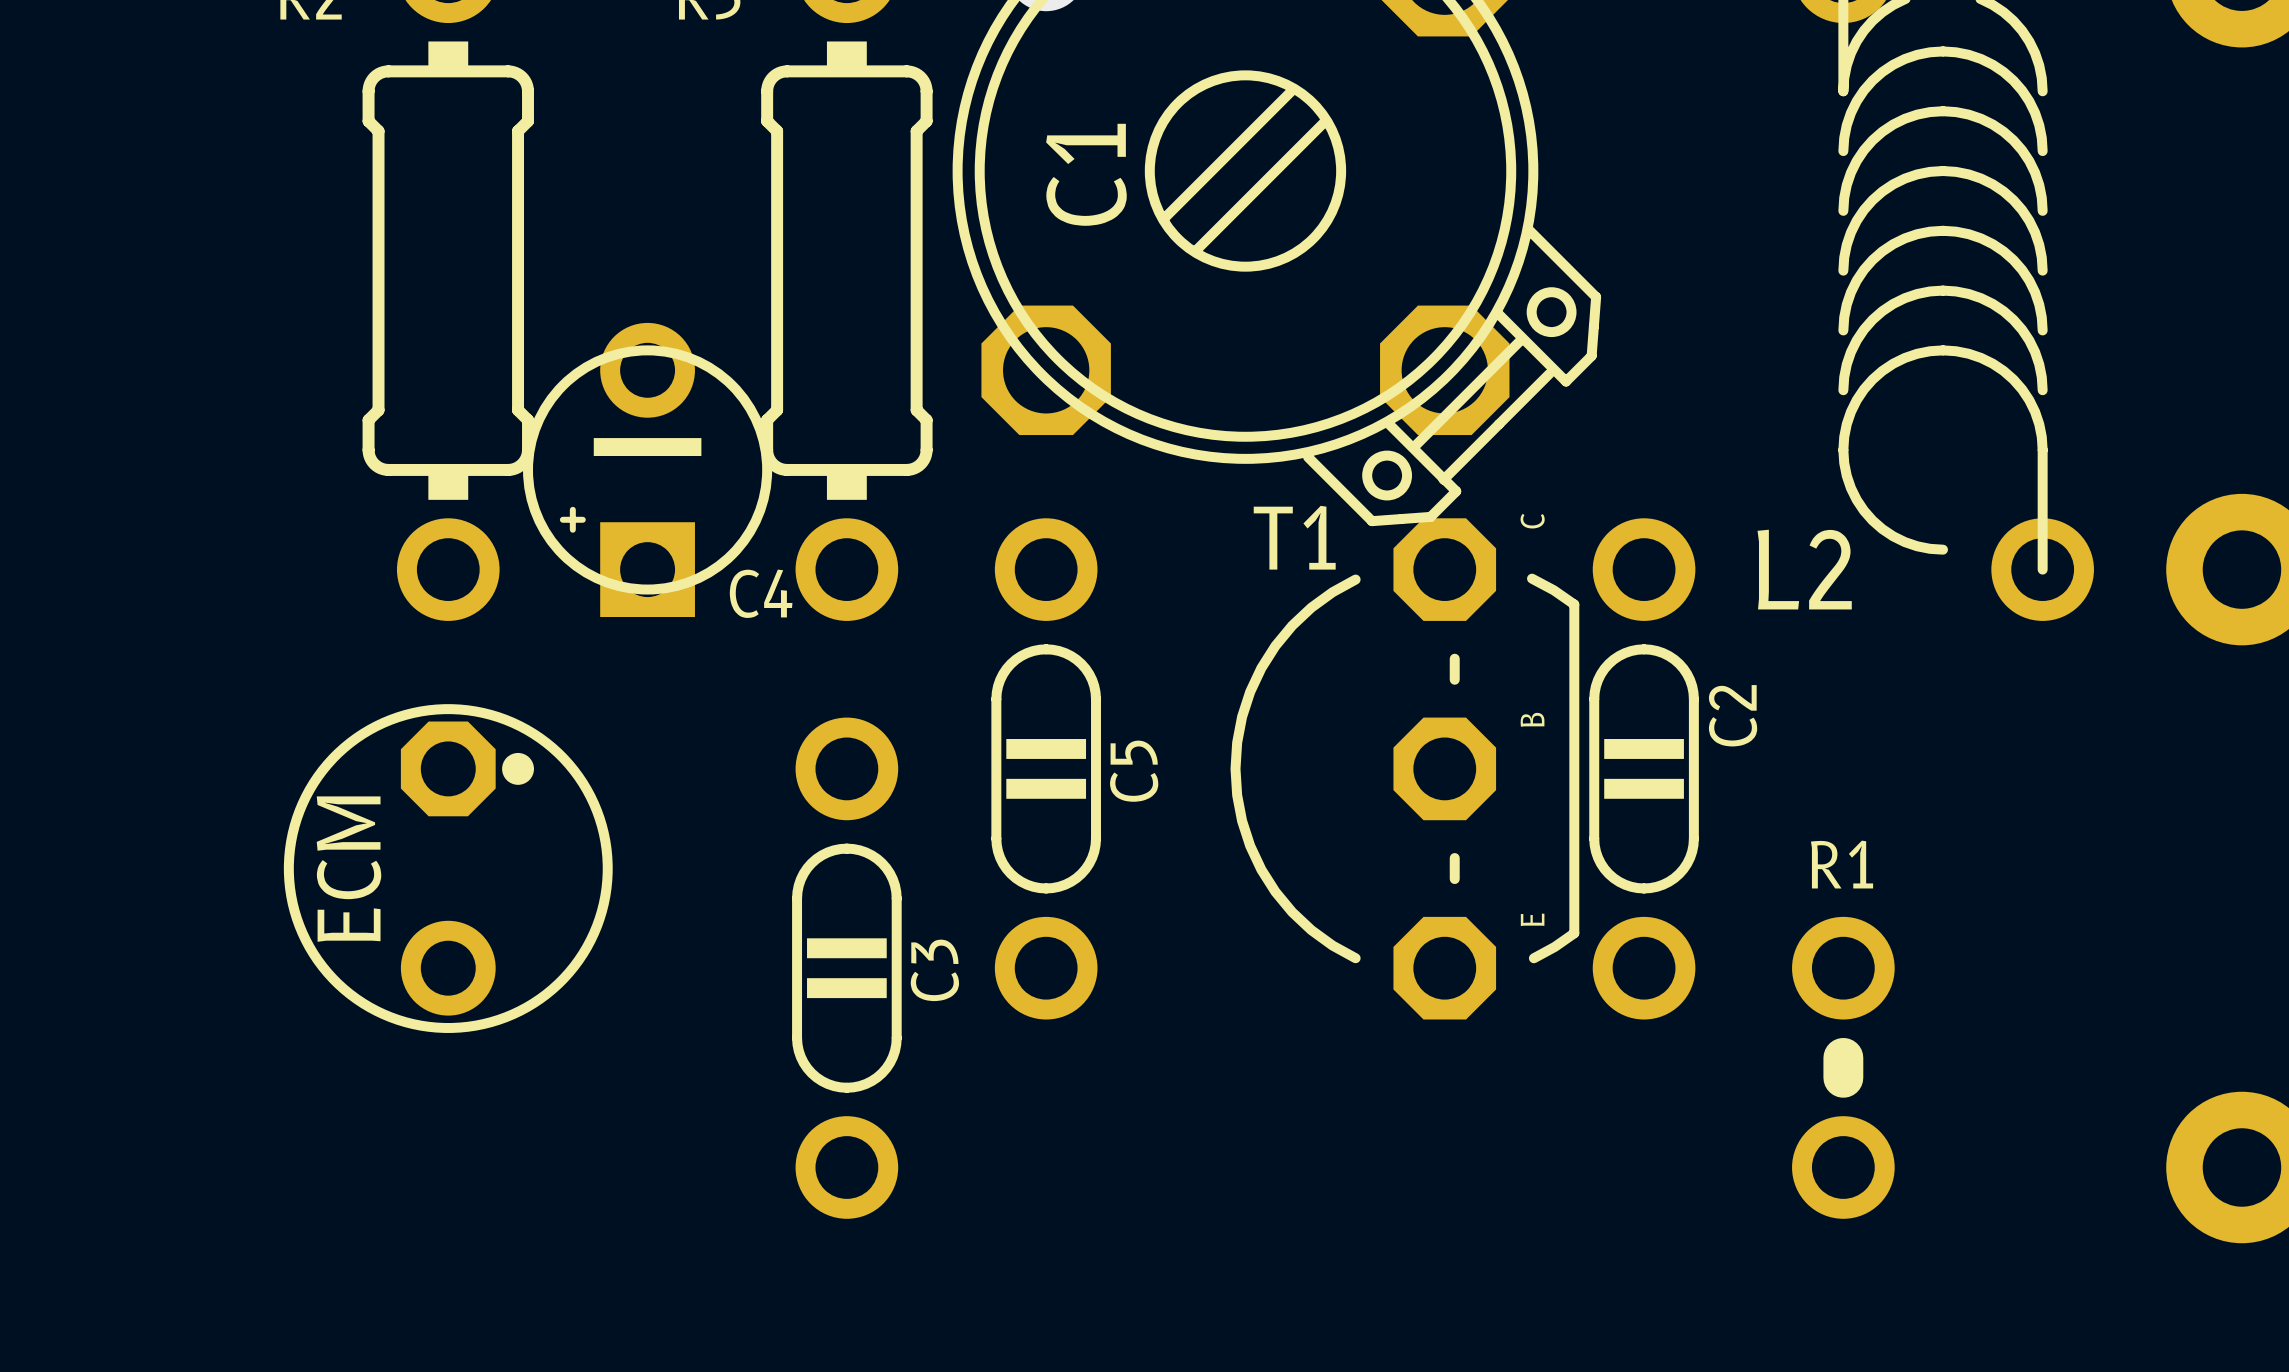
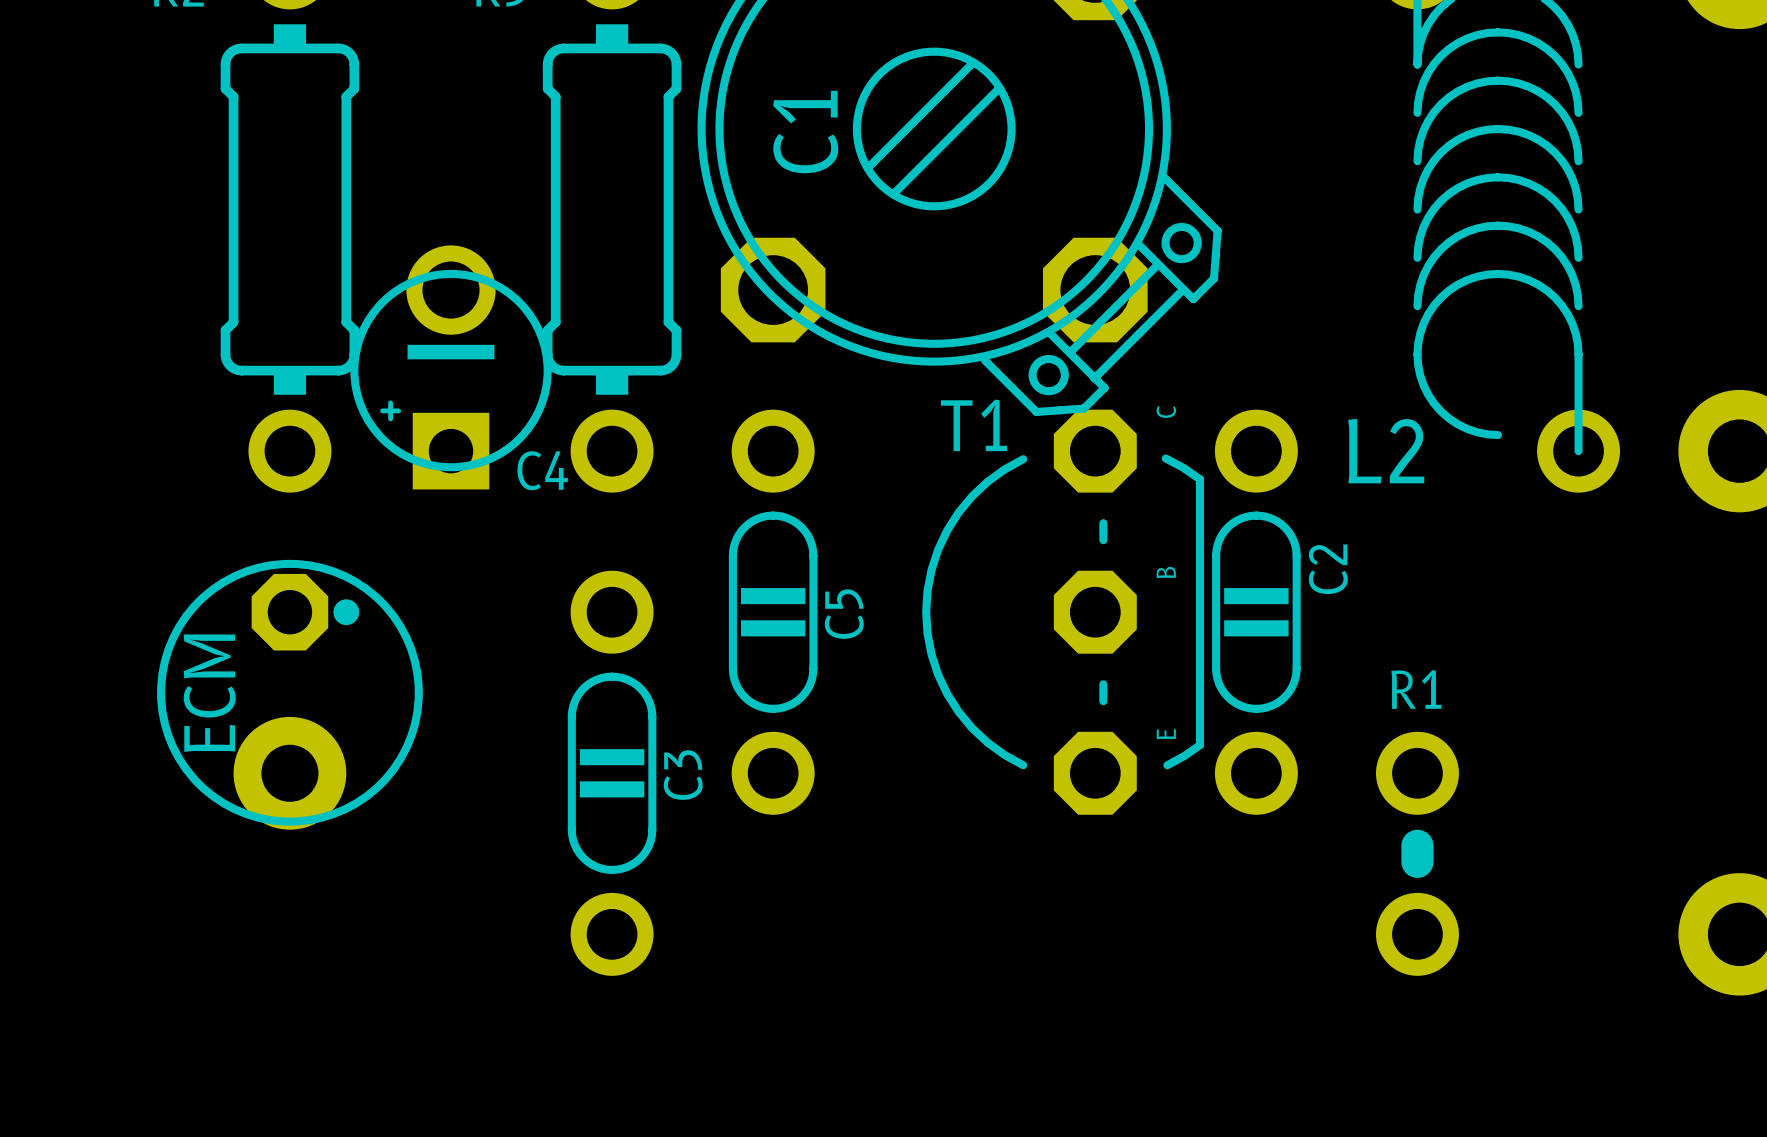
C4 footprint: [523, 322, 773, 617] -> [350, 245, 552, 490]
ECM footprint: [283, 704, 613, 1033] -> [157, 559, 423, 830]

